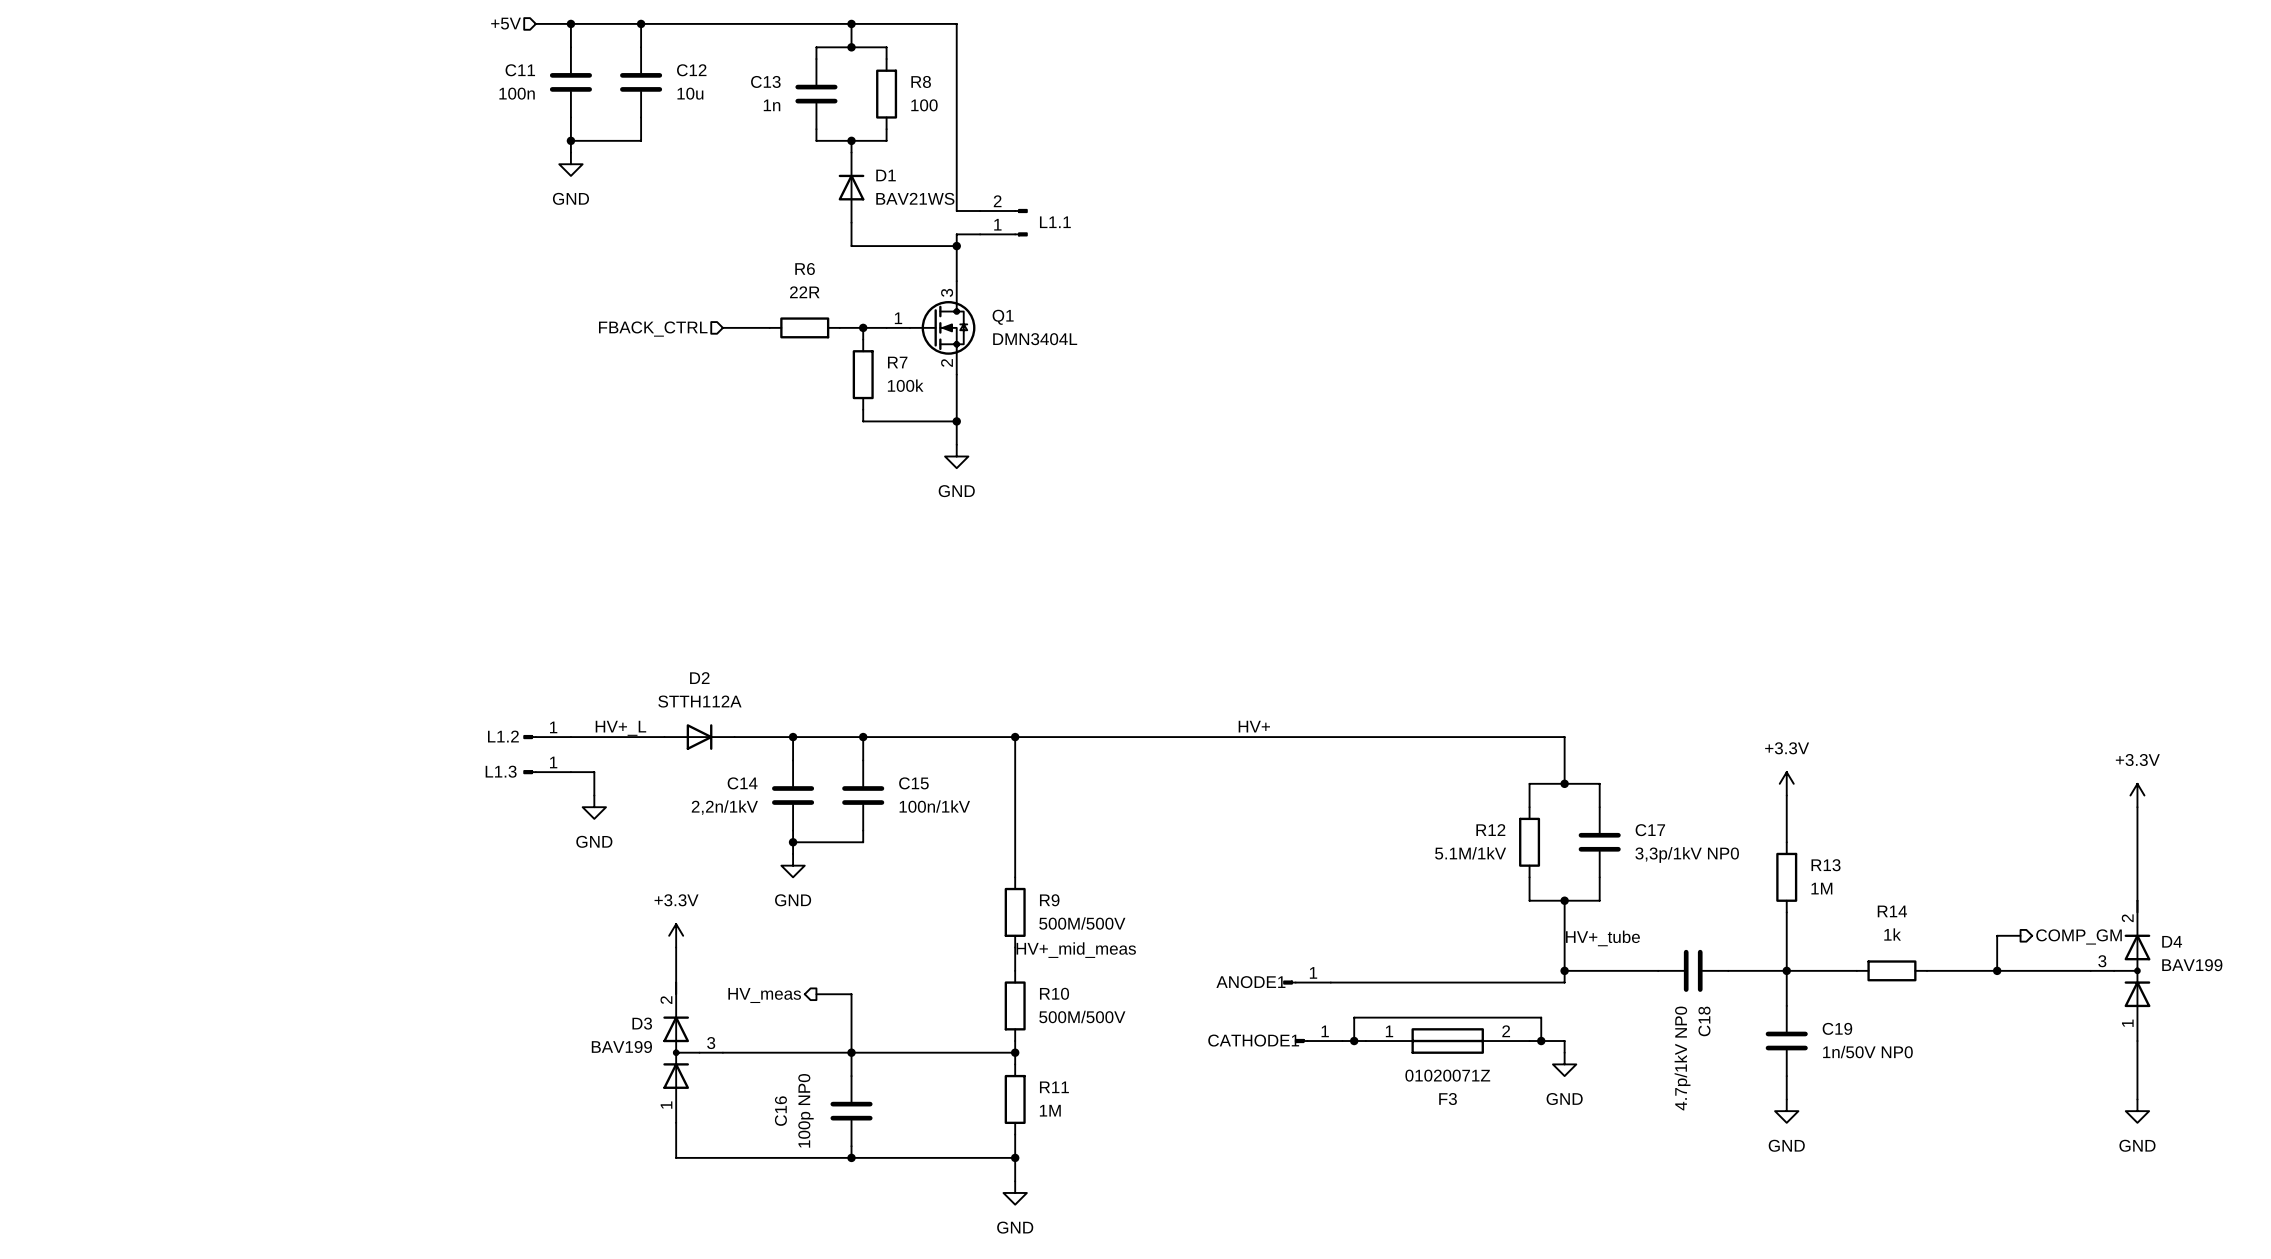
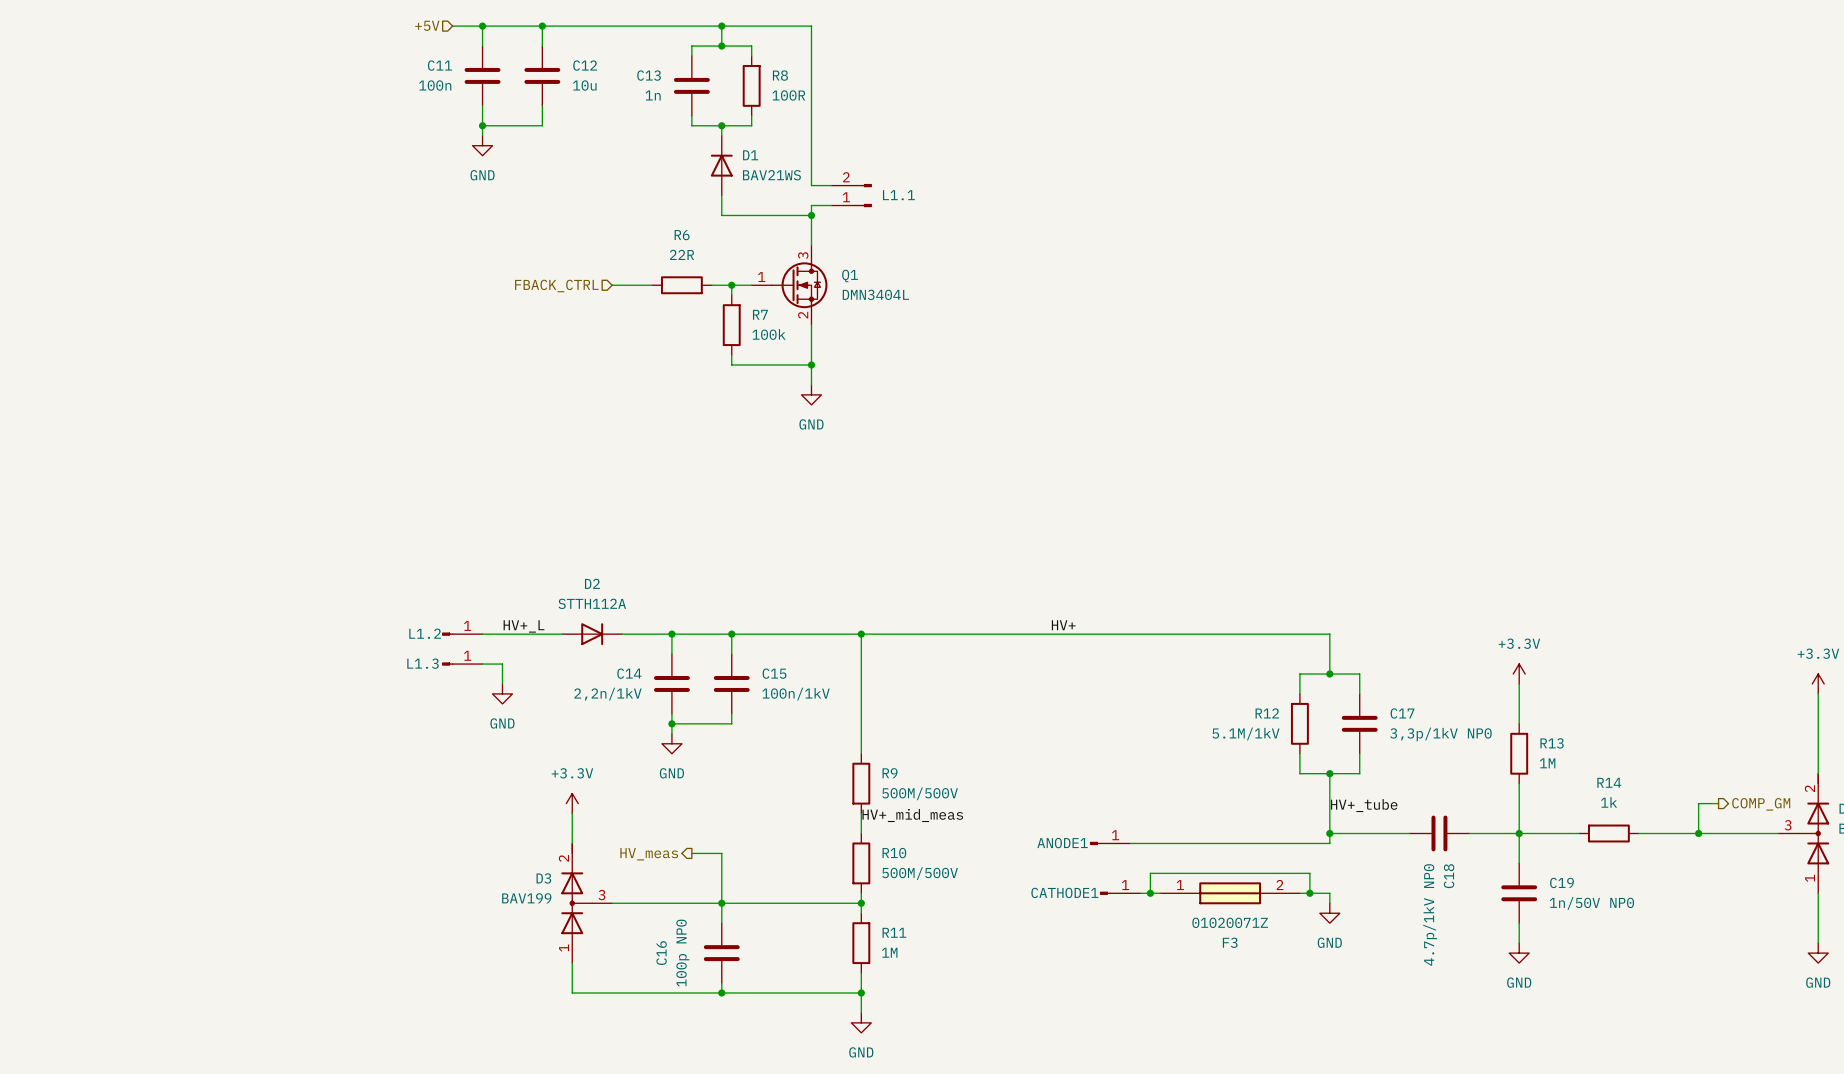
R8 value: 100 (924, 105) -> 100R (788, 95)

